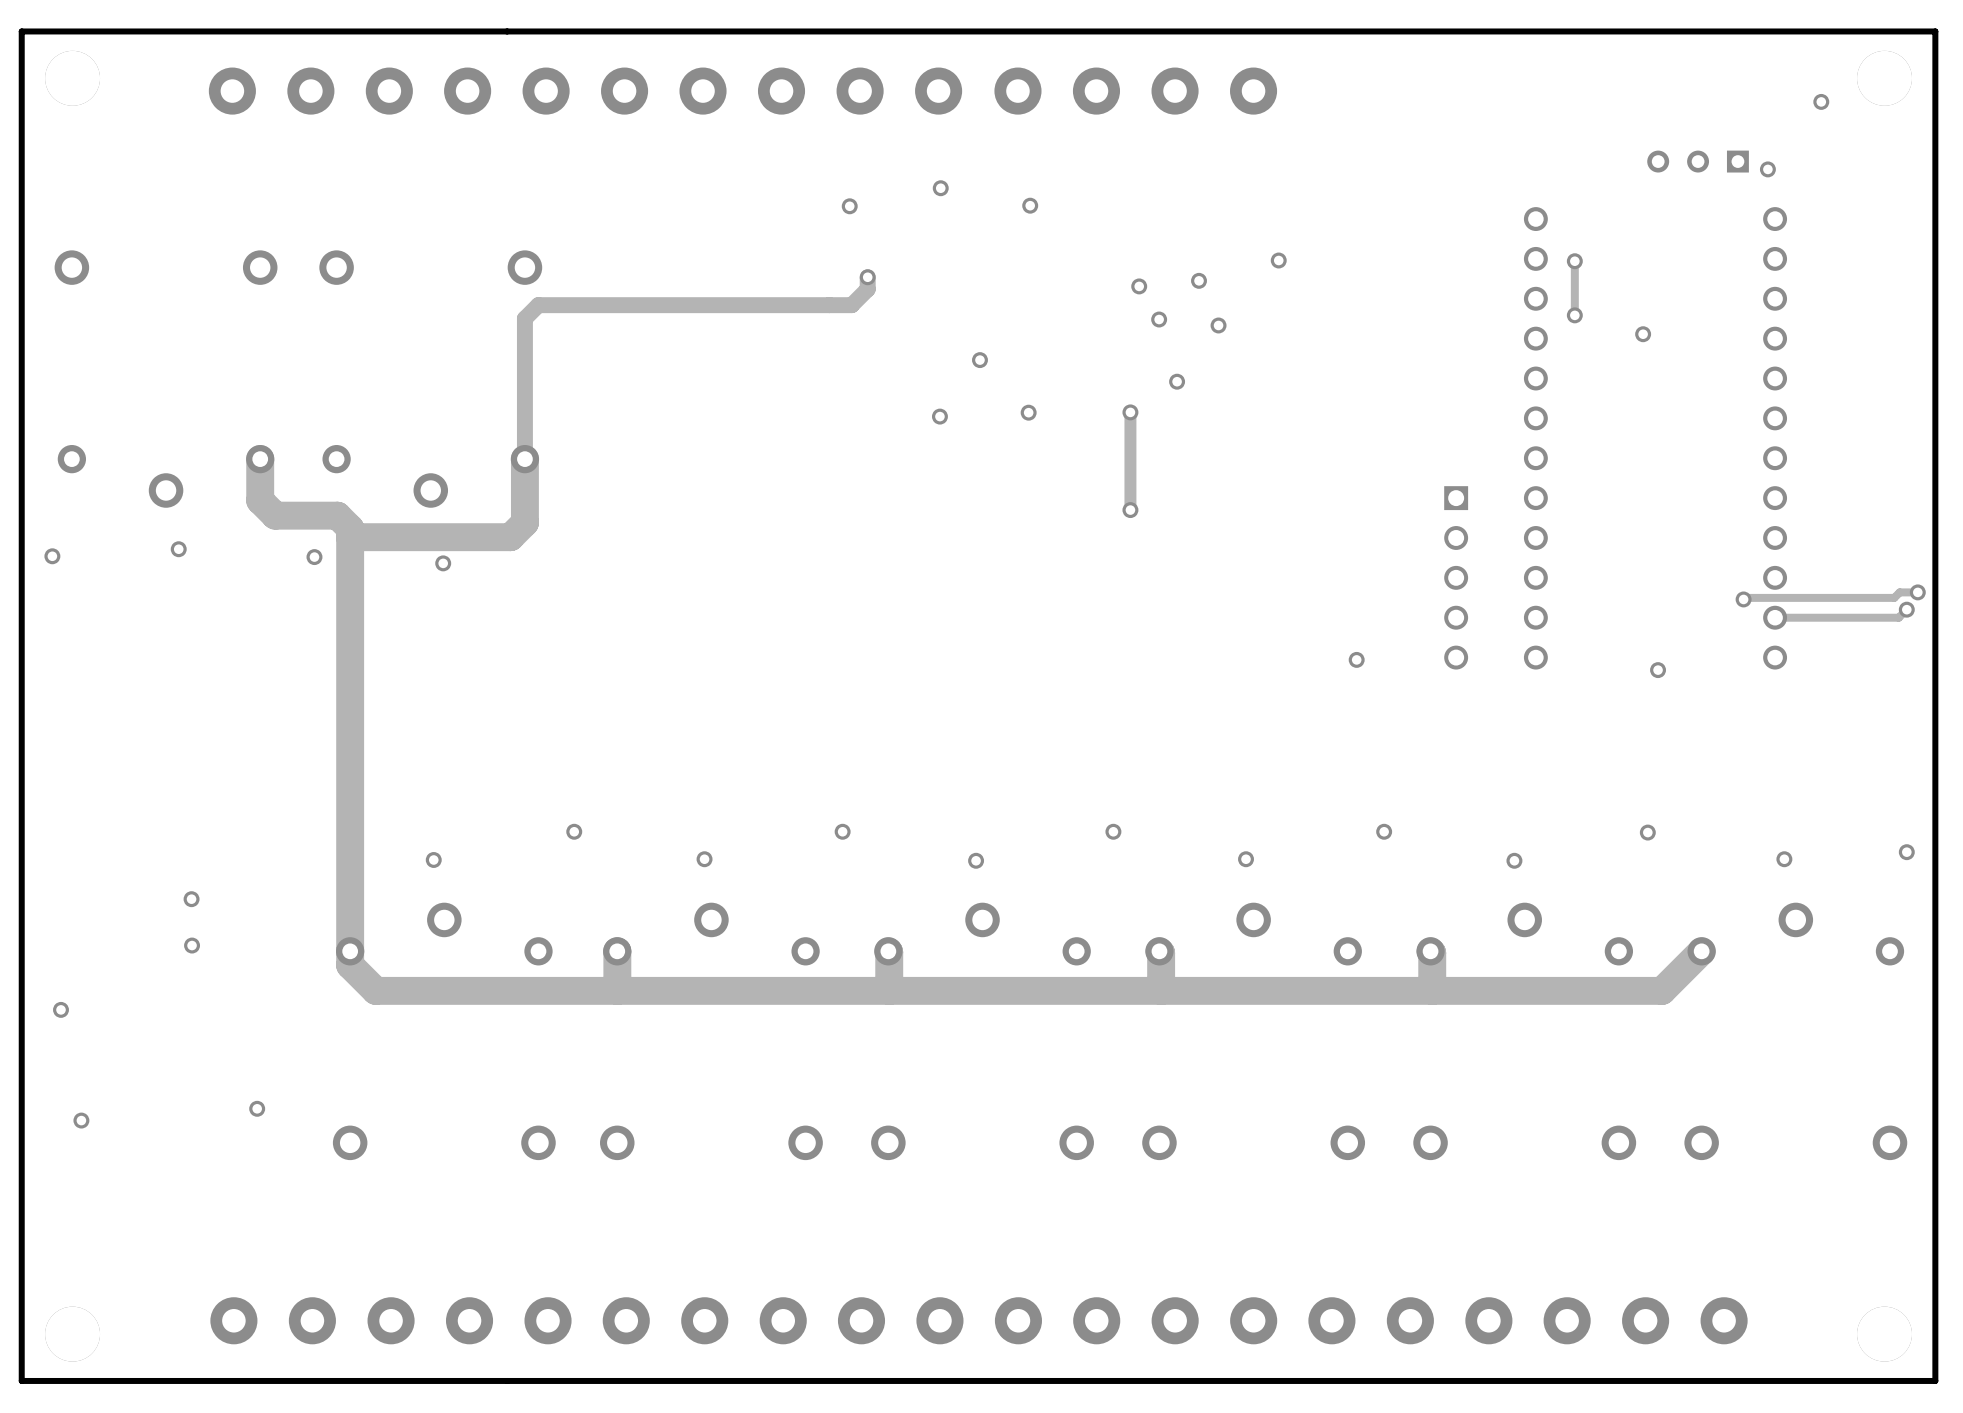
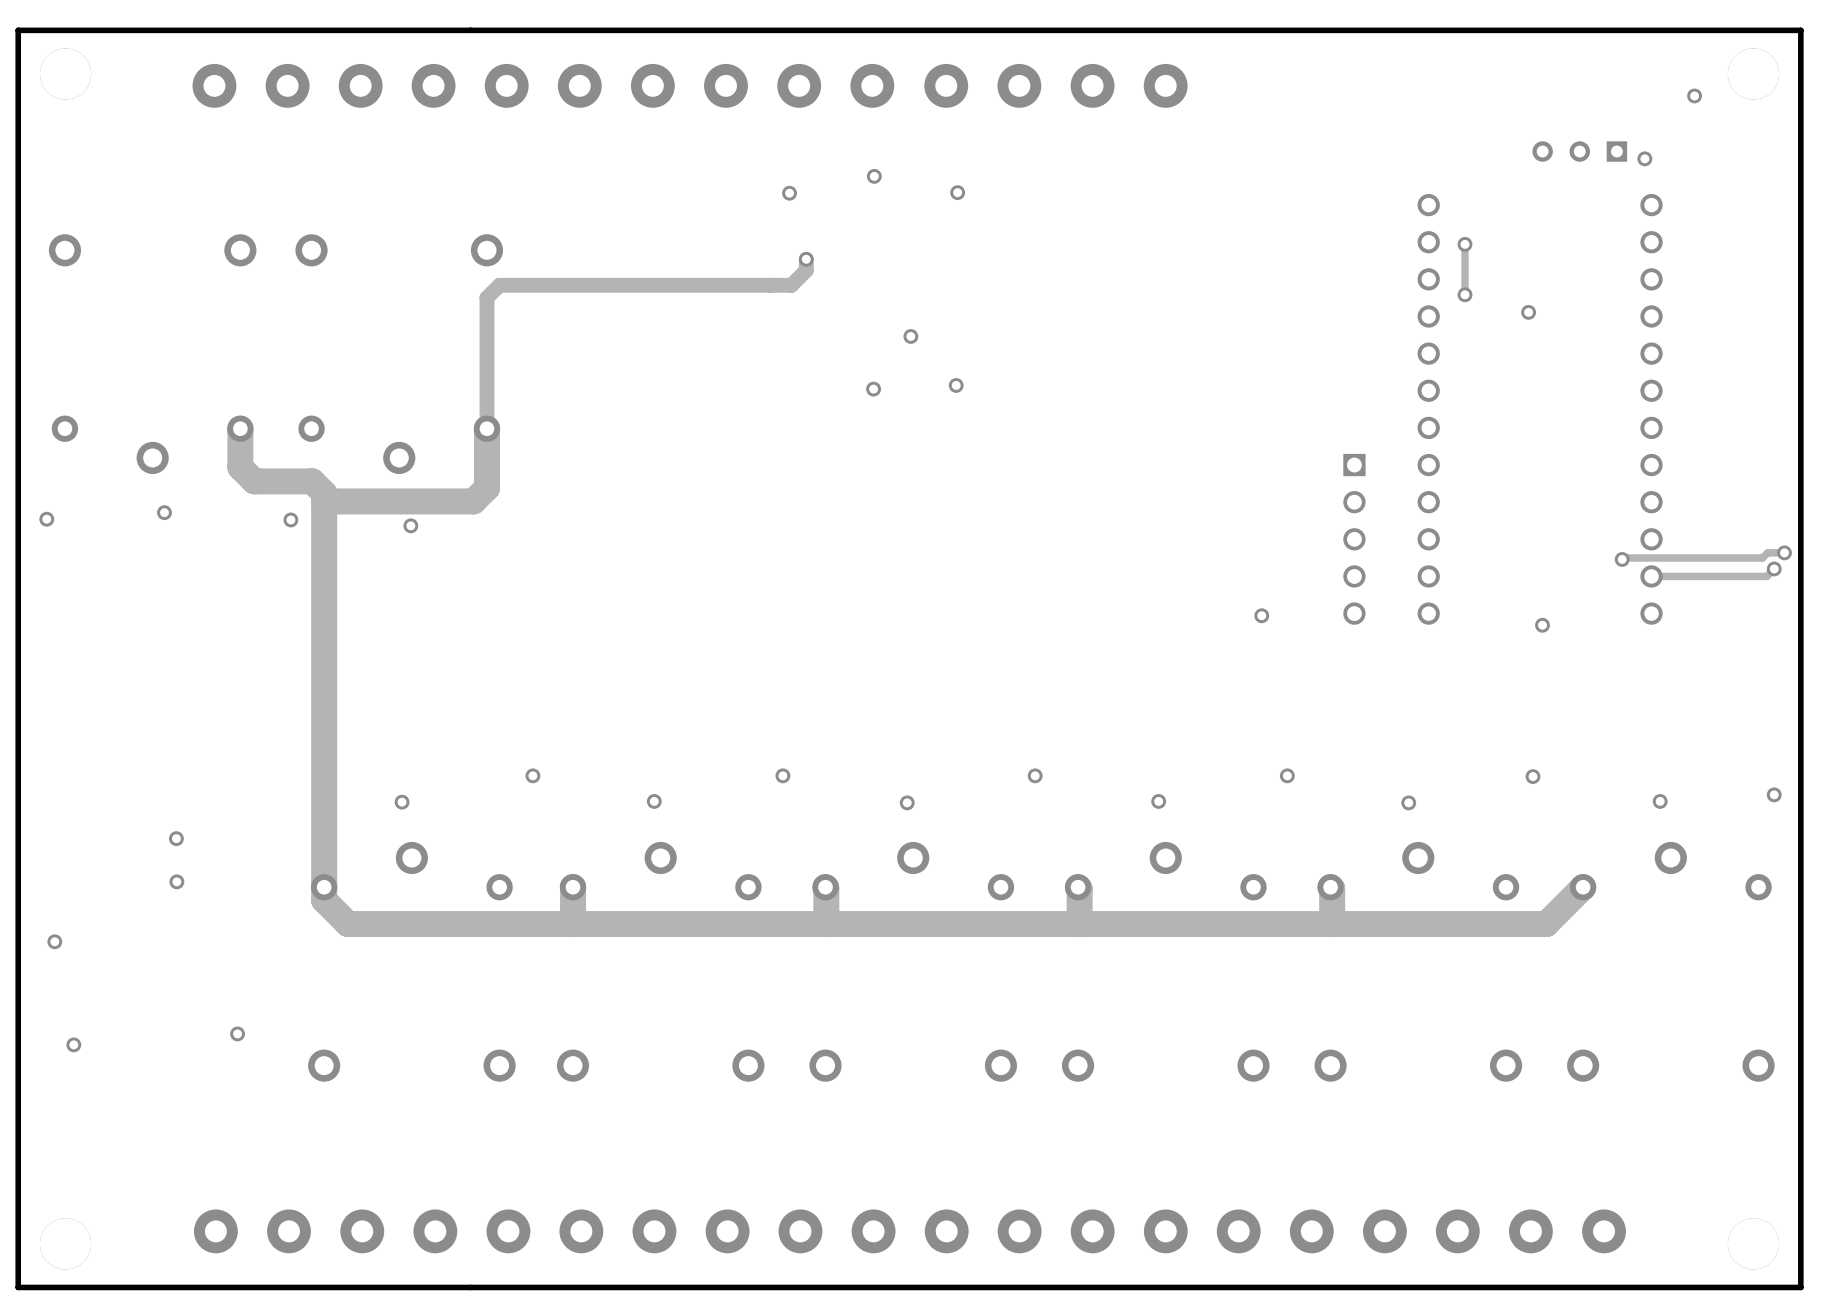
via: (1278, 260) -> none
via: (1199, 280) -> none
via: (1139, 286) -> none
via: (1159, 319) -> none
via: (1218, 325) -> none
via: (1177, 381) -> none
track: (1130, 412) (1130, 510) -> none
via: (1130, 412) -> none
via: (1130, 510) -> none

